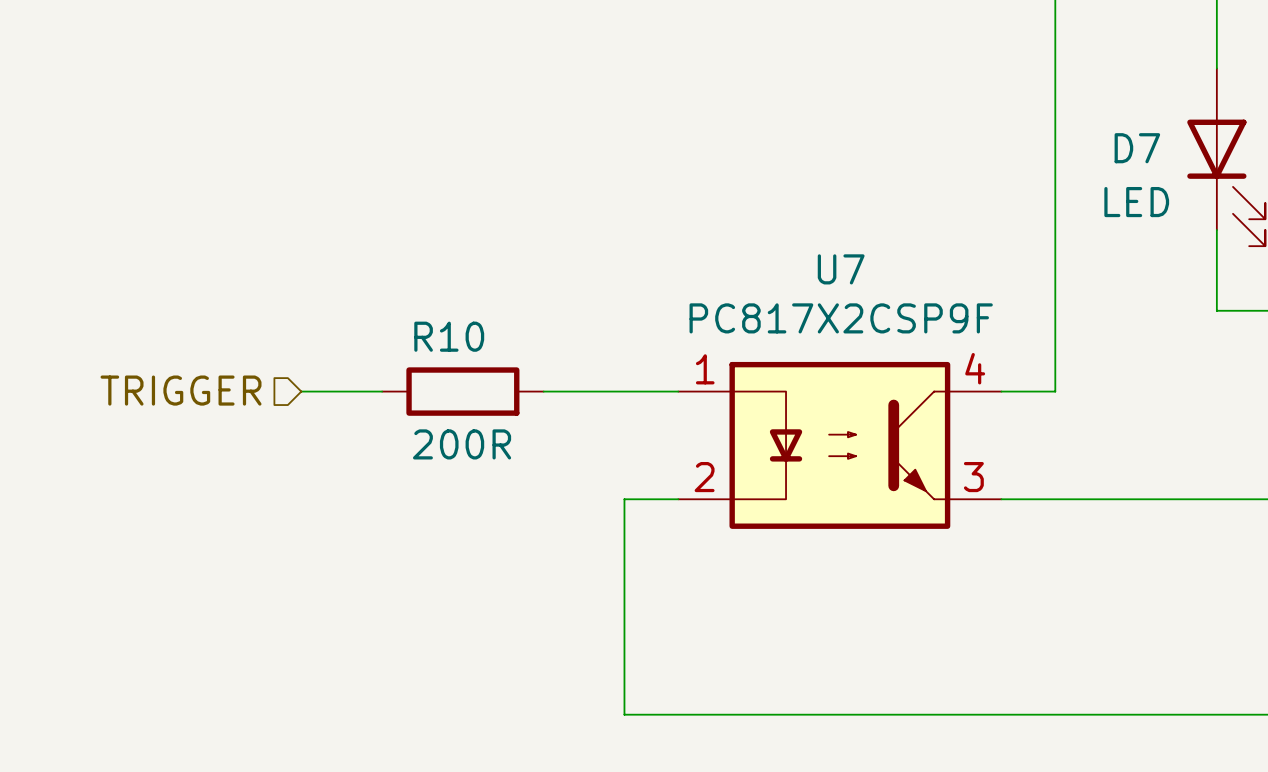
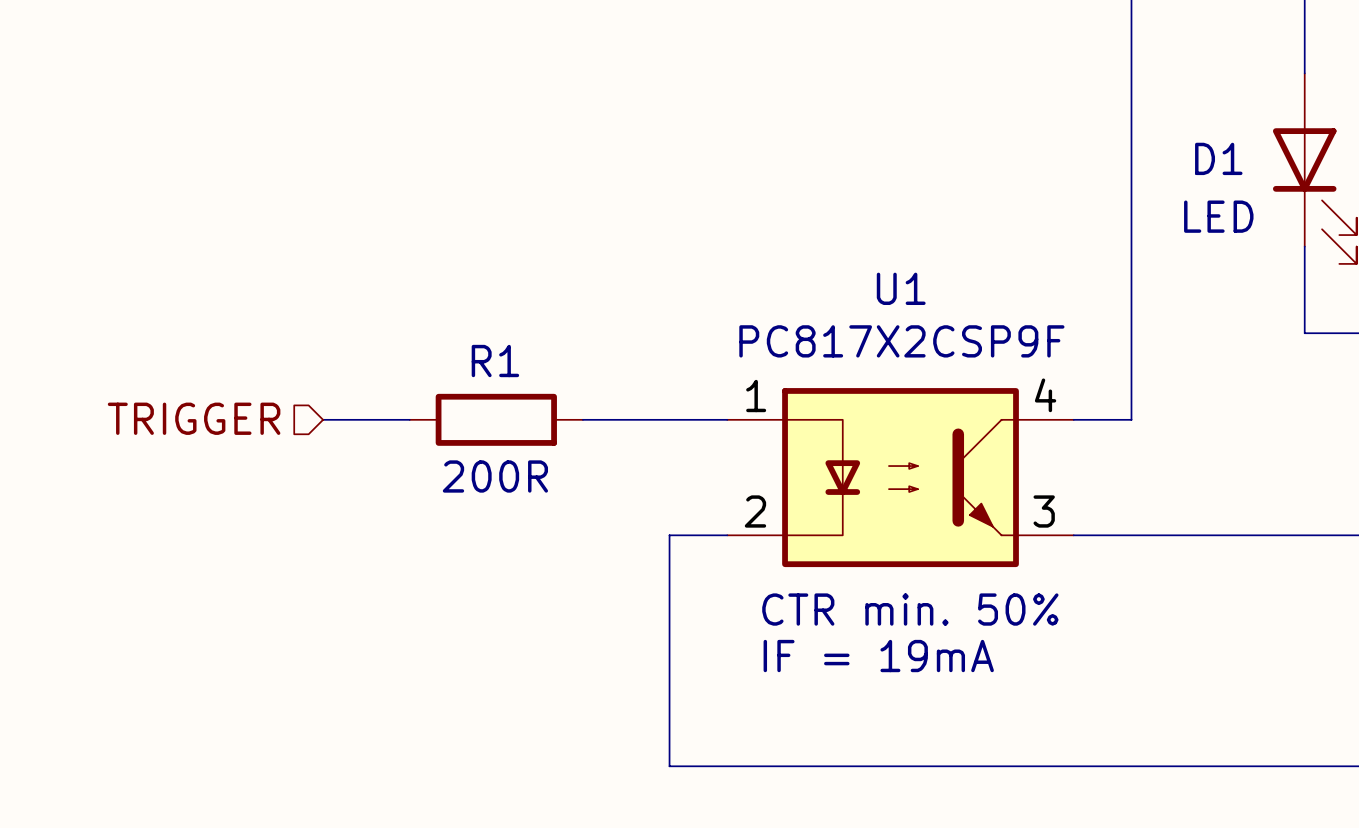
D7 name: D7 (1137, 148) -> D1 (1218, 158)
U7 name: U7 (841, 269) -> U1 (901, 288)
R10 name: R10 (449, 336) -> R1 (495, 361)
text: none -> CTR min. 50% (910, 609)
text: none -> IF = 19mA (878, 656)

